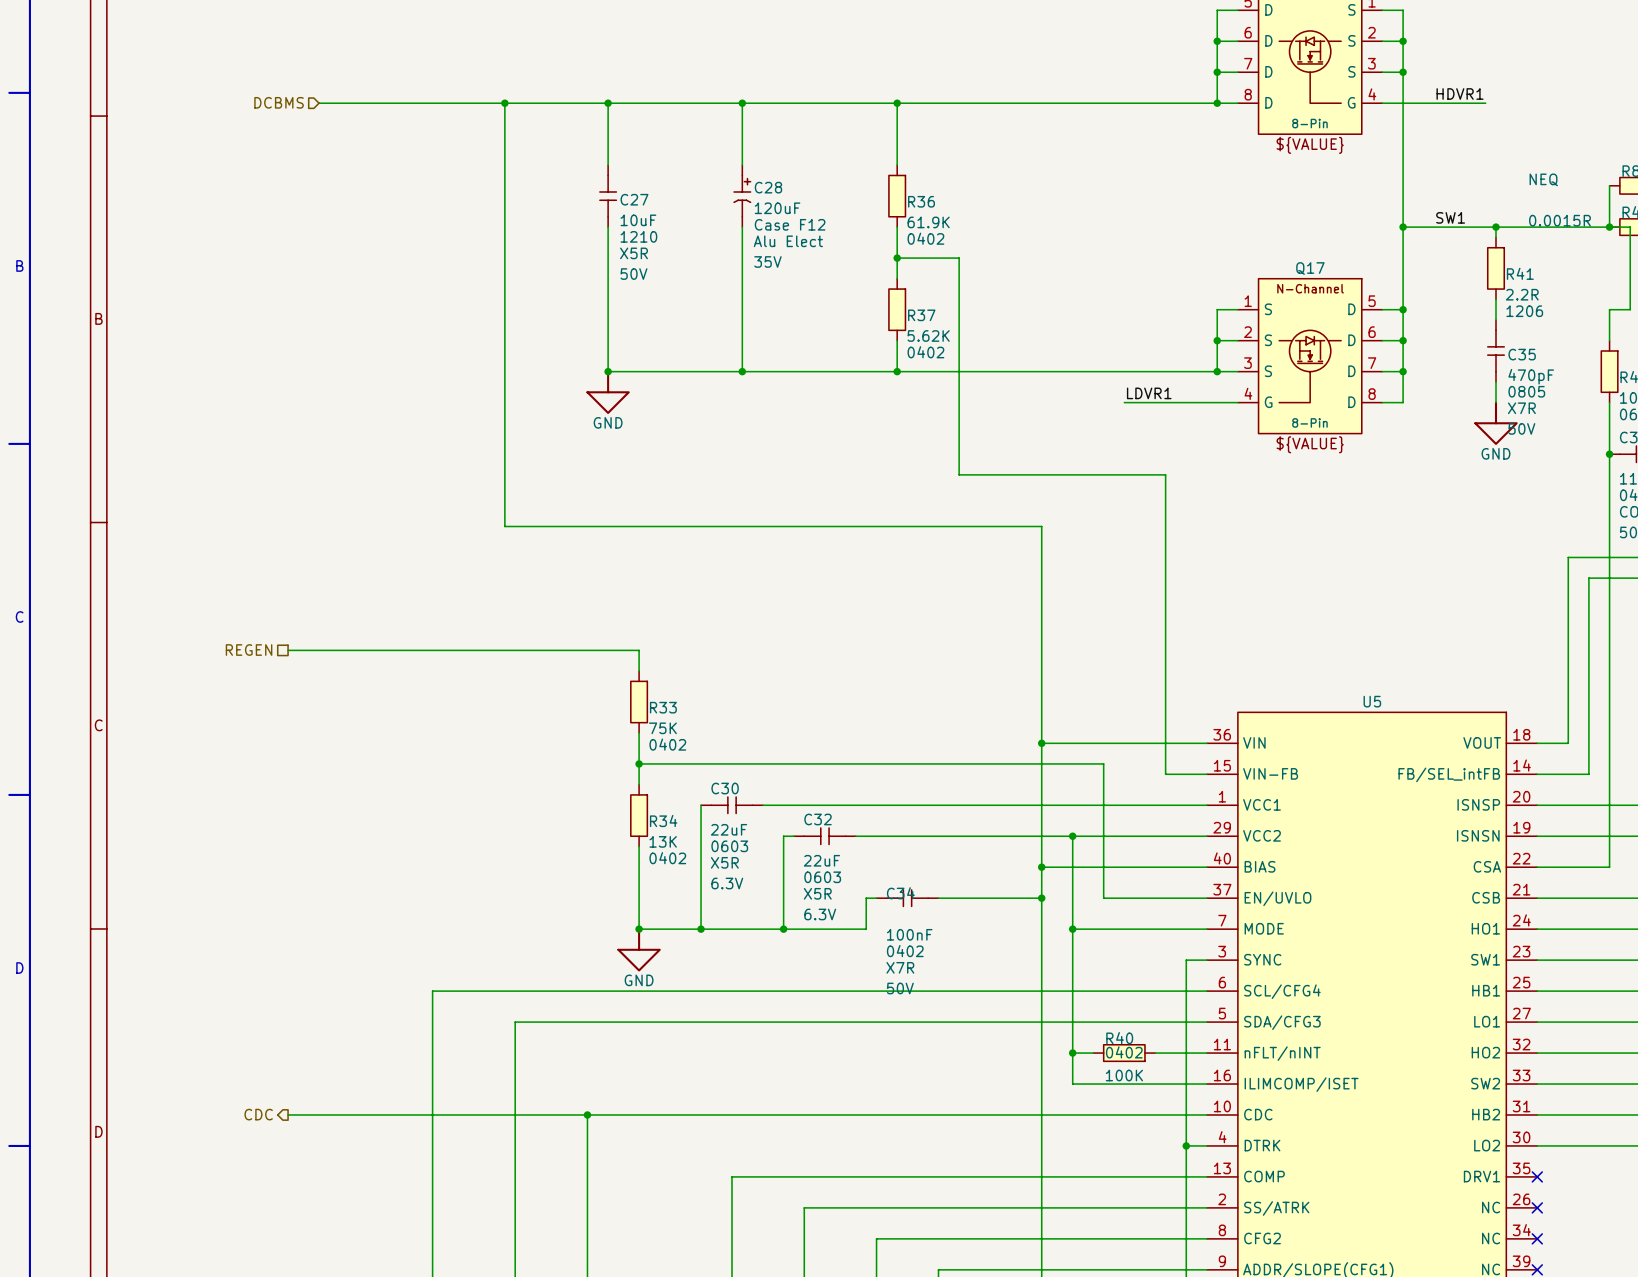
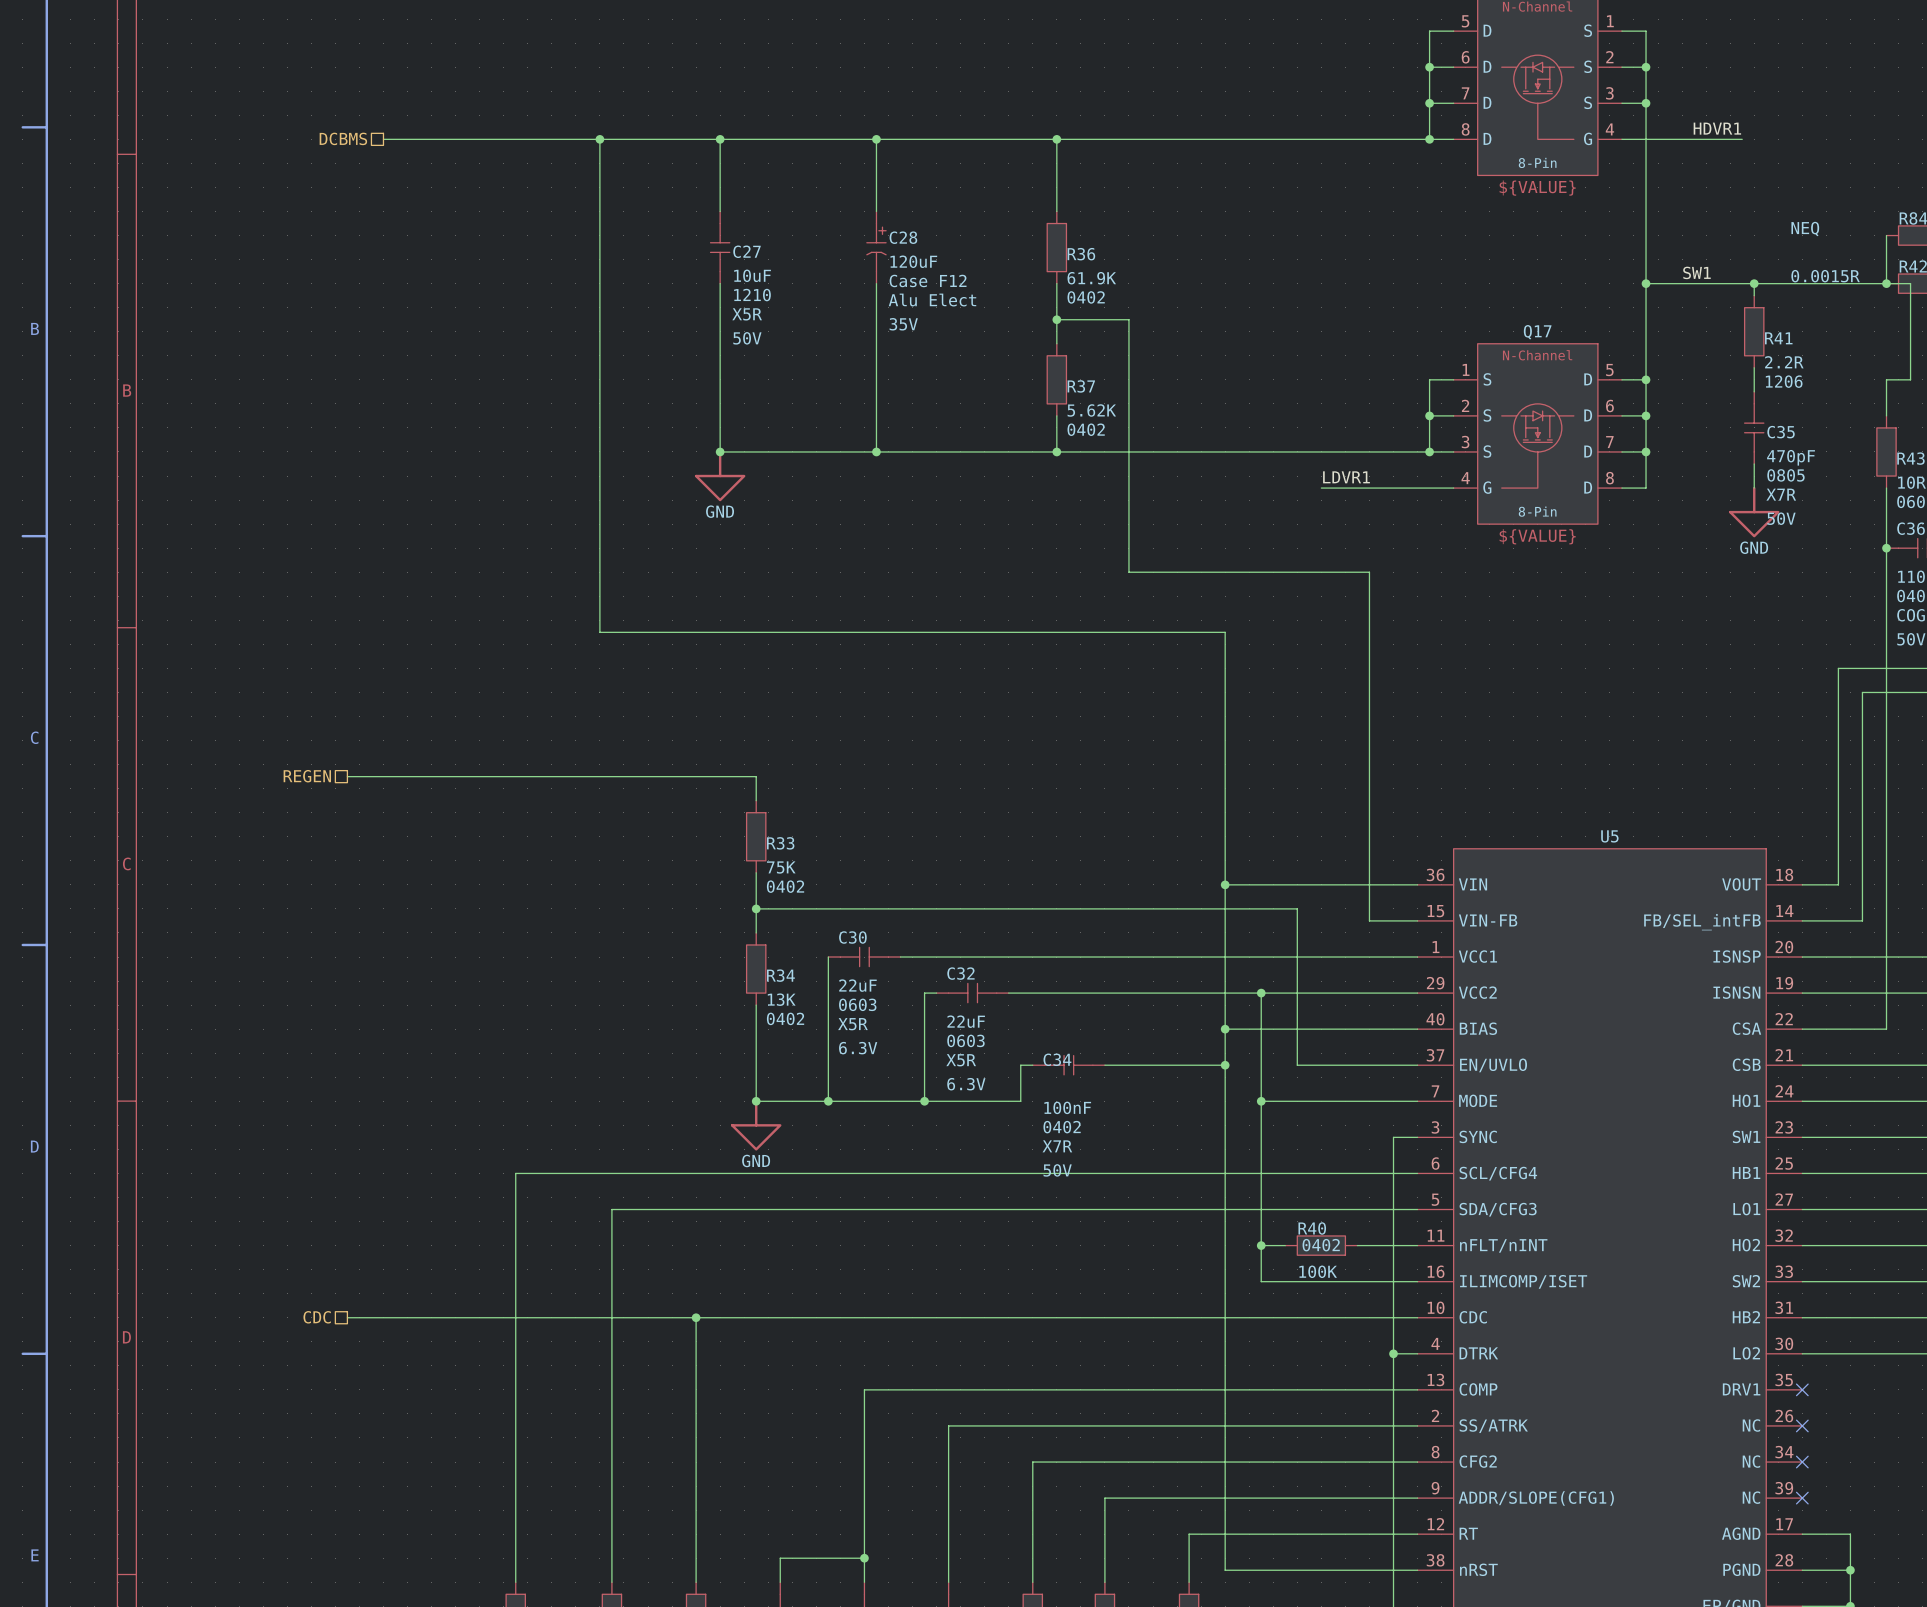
hierarchical label shape: input (279, 102) -> passive (343, 138)
hierarchical label shape: output (258, 1114) -> passive (317, 1317)

